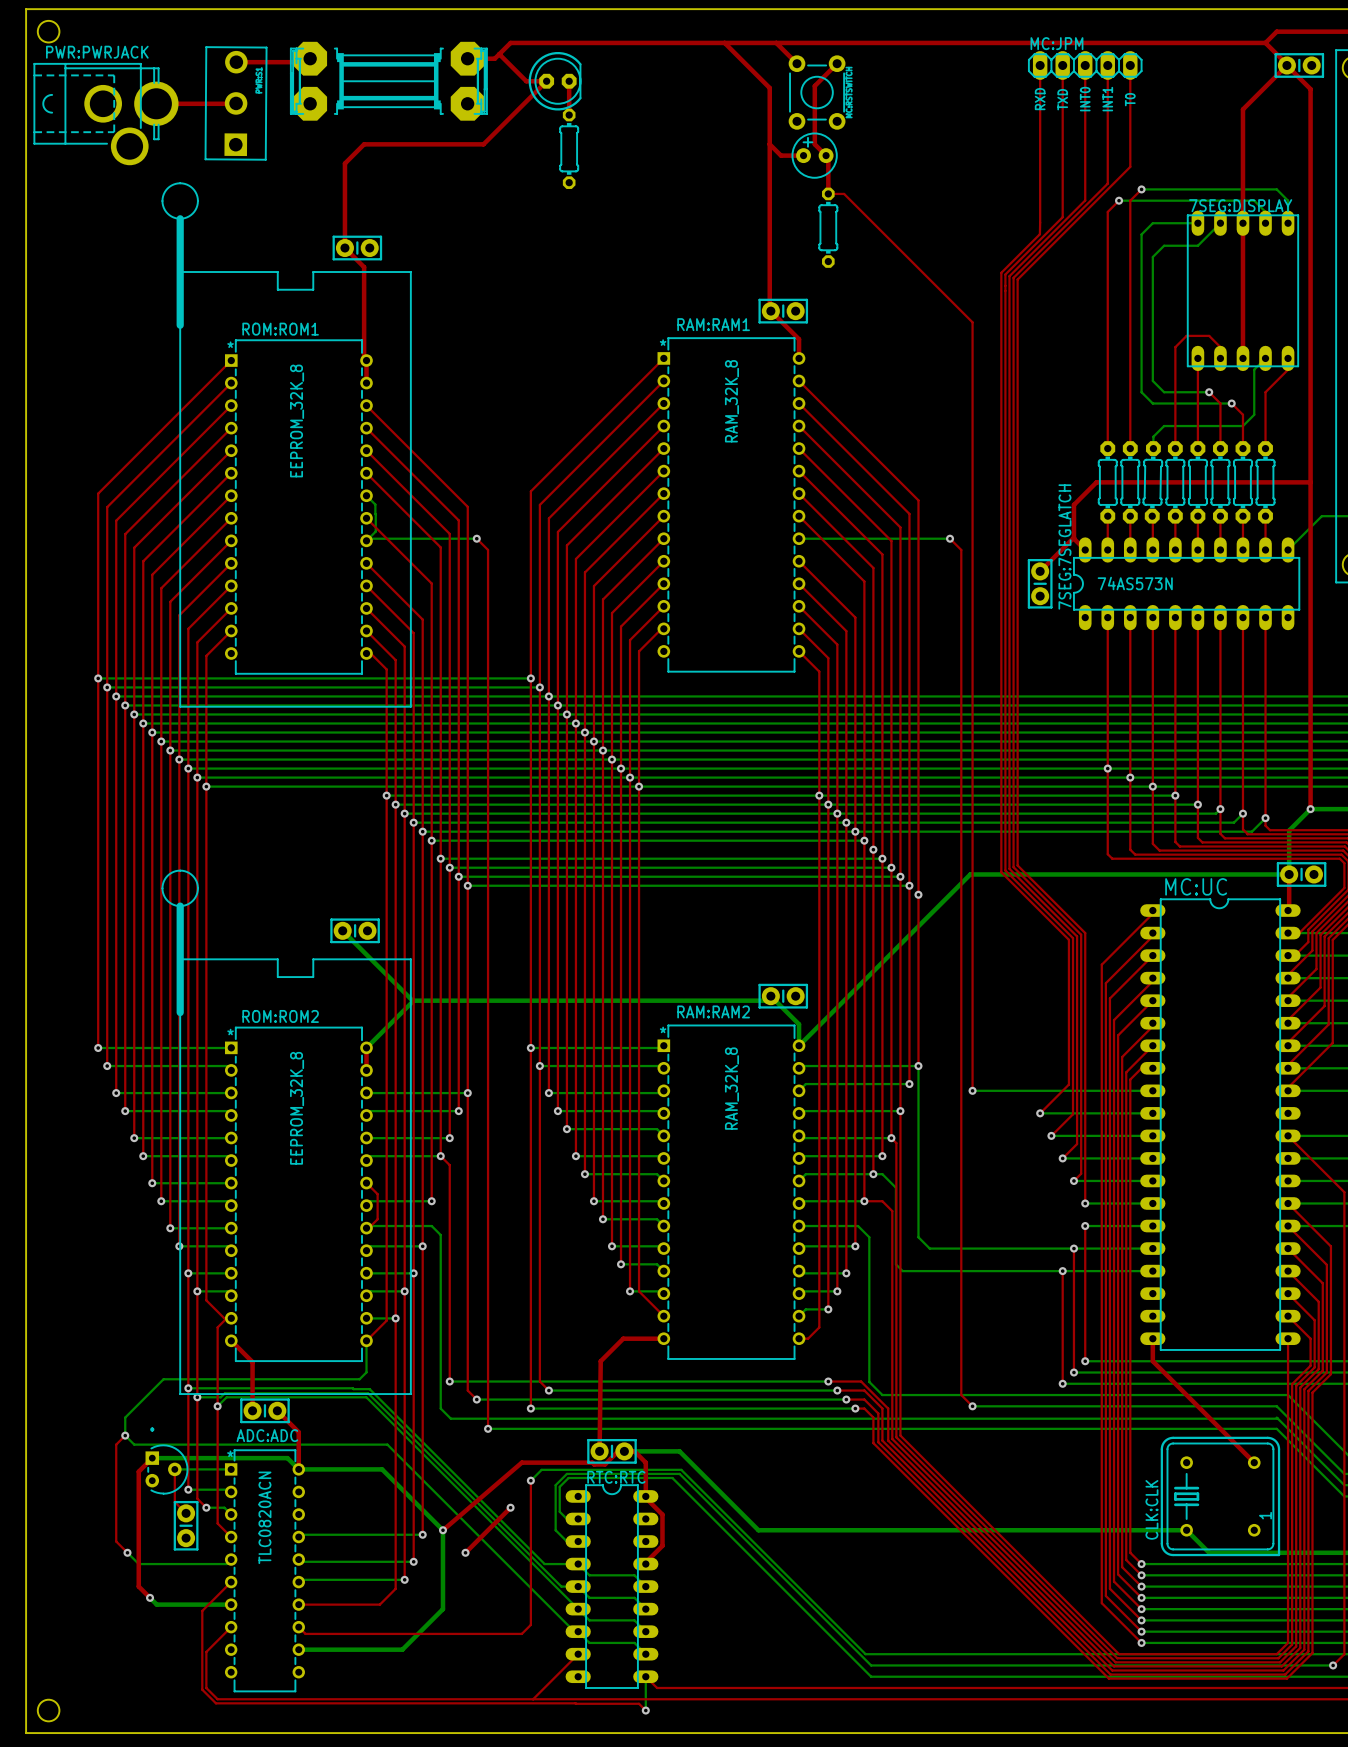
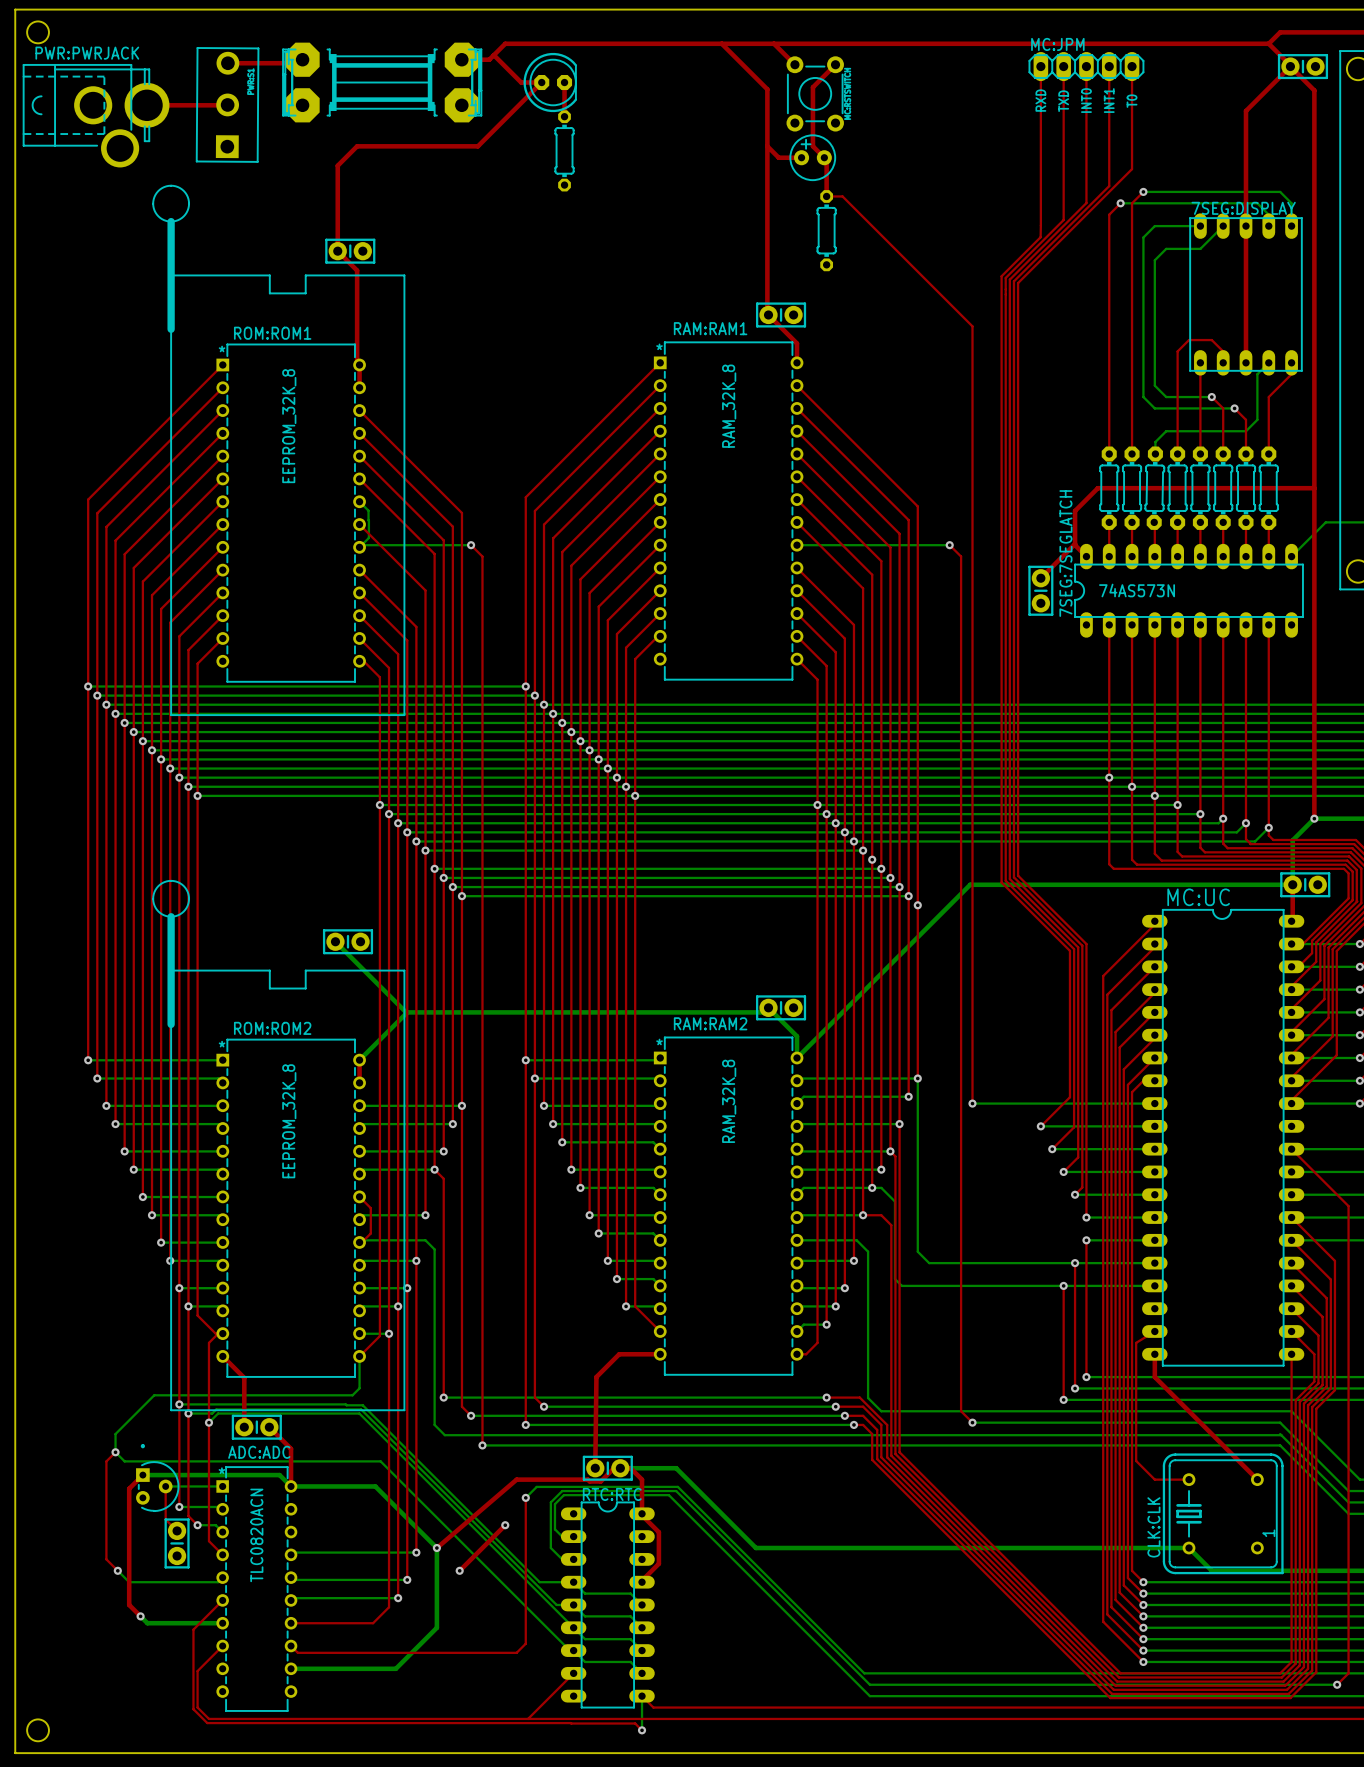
top track: none -> (1154, 1331) (1136, 1342) (1136, 1460) (1154, 1479) (1189, 1479)

